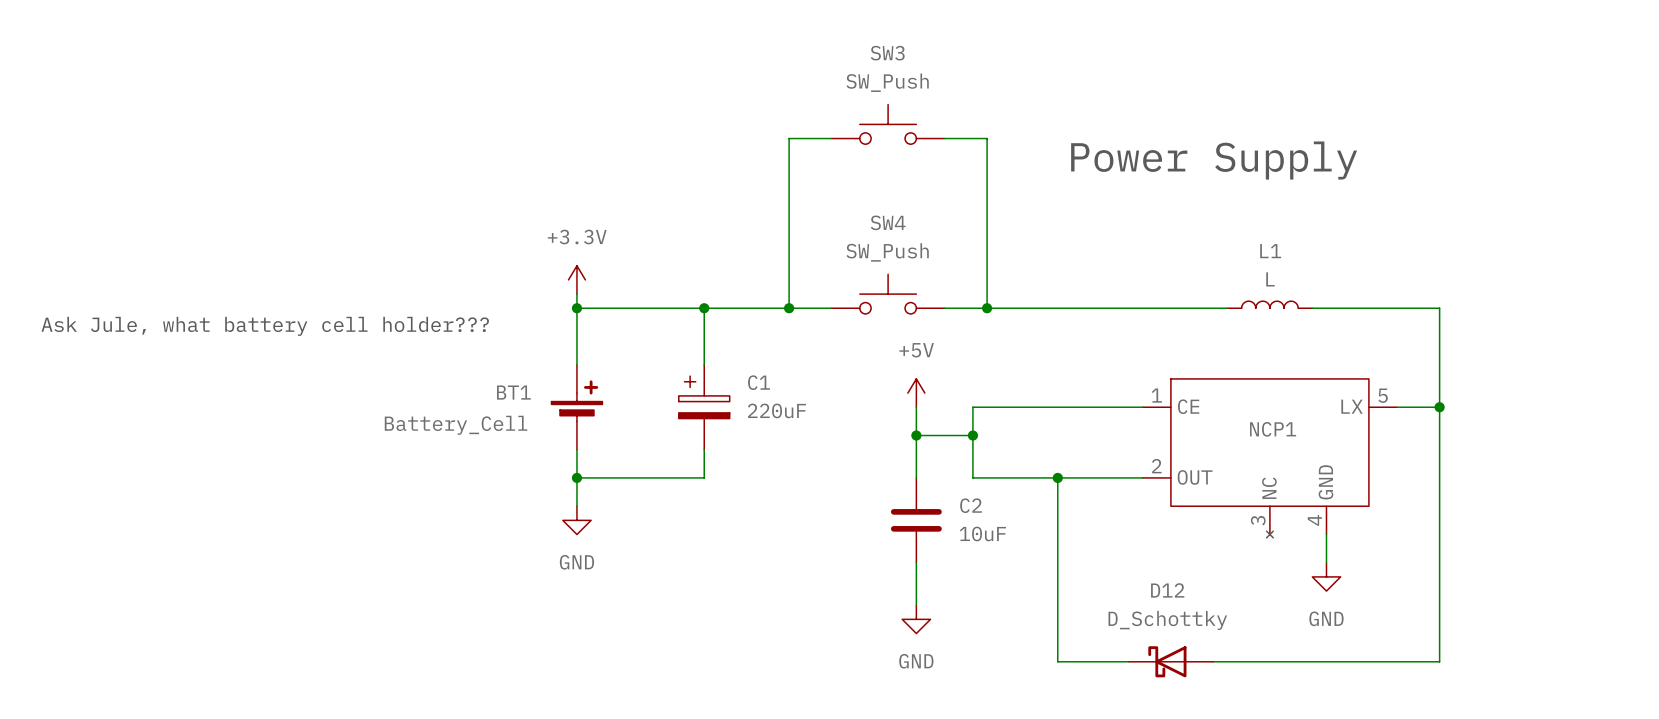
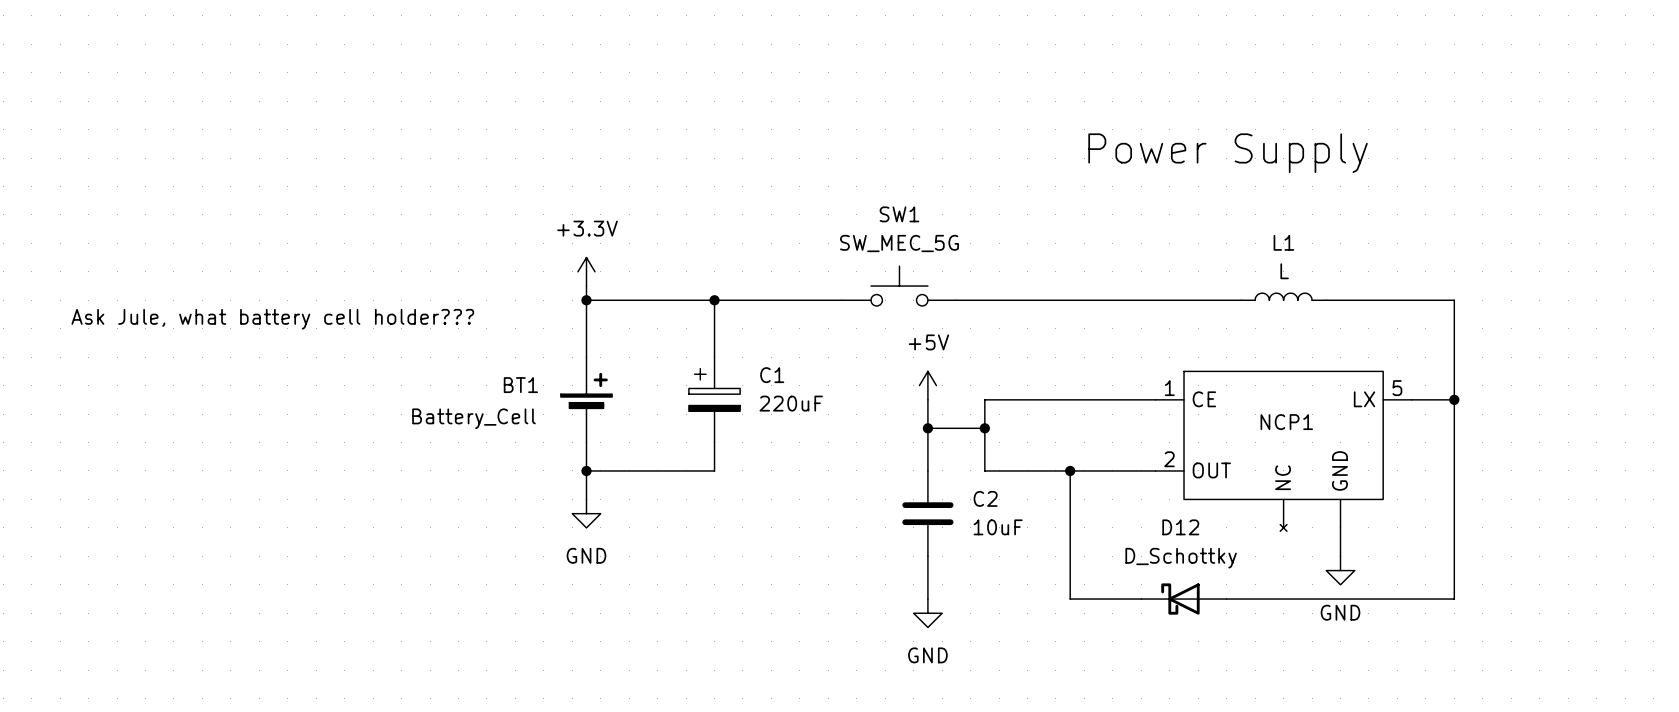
SW3: SW_Push (888, 124) -> none
wire: (831, 138) (789, 138) (789, 308) -> none
wire: (944, 138) (987, 138) (987, 308) -> none
SW4 name: SW4 (888, 222) -> SW1 (899, 214)
SW4 value: SW_Push (887, 252) -> SW_MEC_5G (899, 243)
junction: (789, 308) -> none
junction: (987, 308) -> none
NCP1 pin number: 3 (1258, 520) -> none
NCP1 pin number: 4 (1314, 520) -> none
wire: (1057, 605) (1057, 661) (1128, 661) -> (1070, 599) (1141, 599)
wire: (1439, 605) (1439, 661) (1213, 661) -> (1454, 599) (1226, 599)
D12 position: (1170, 661) -> (1184, 599)

